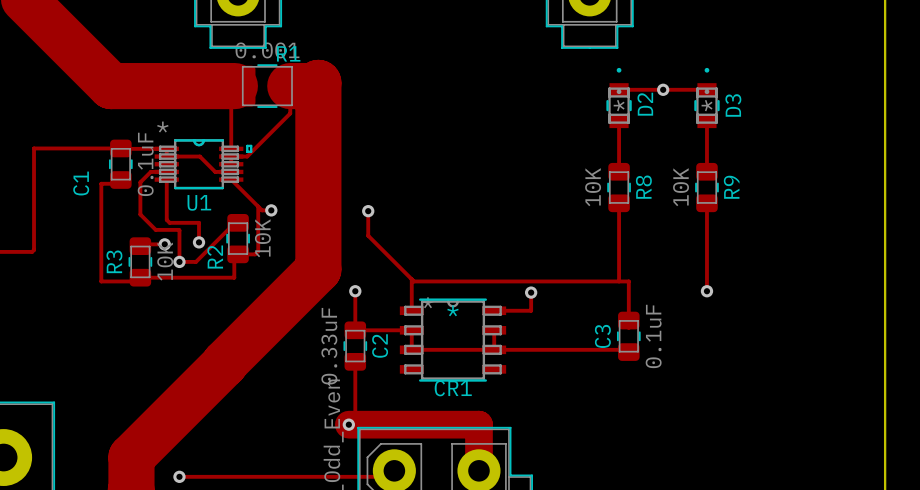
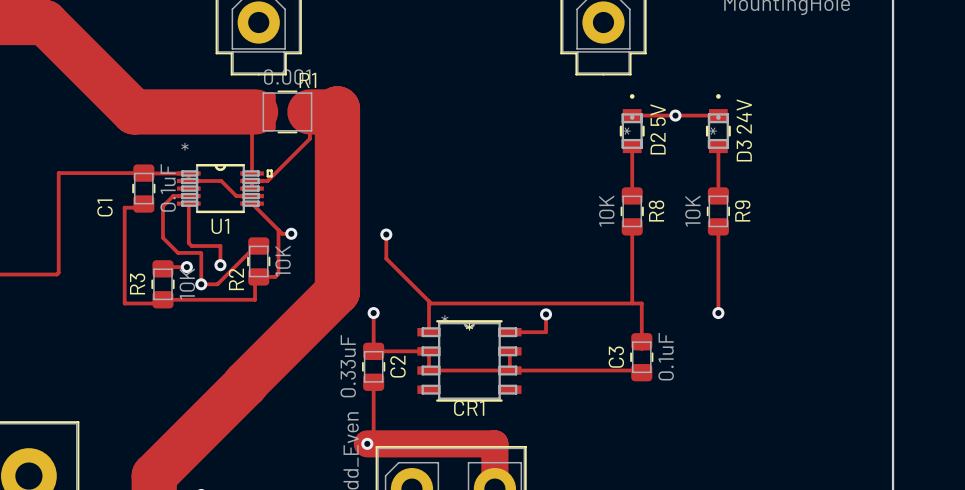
D2 name: D2 (645, 104) -> D2 5V (658, 129)
D3 name: D3 (733, 105) -> D3 24V (744, 130)

